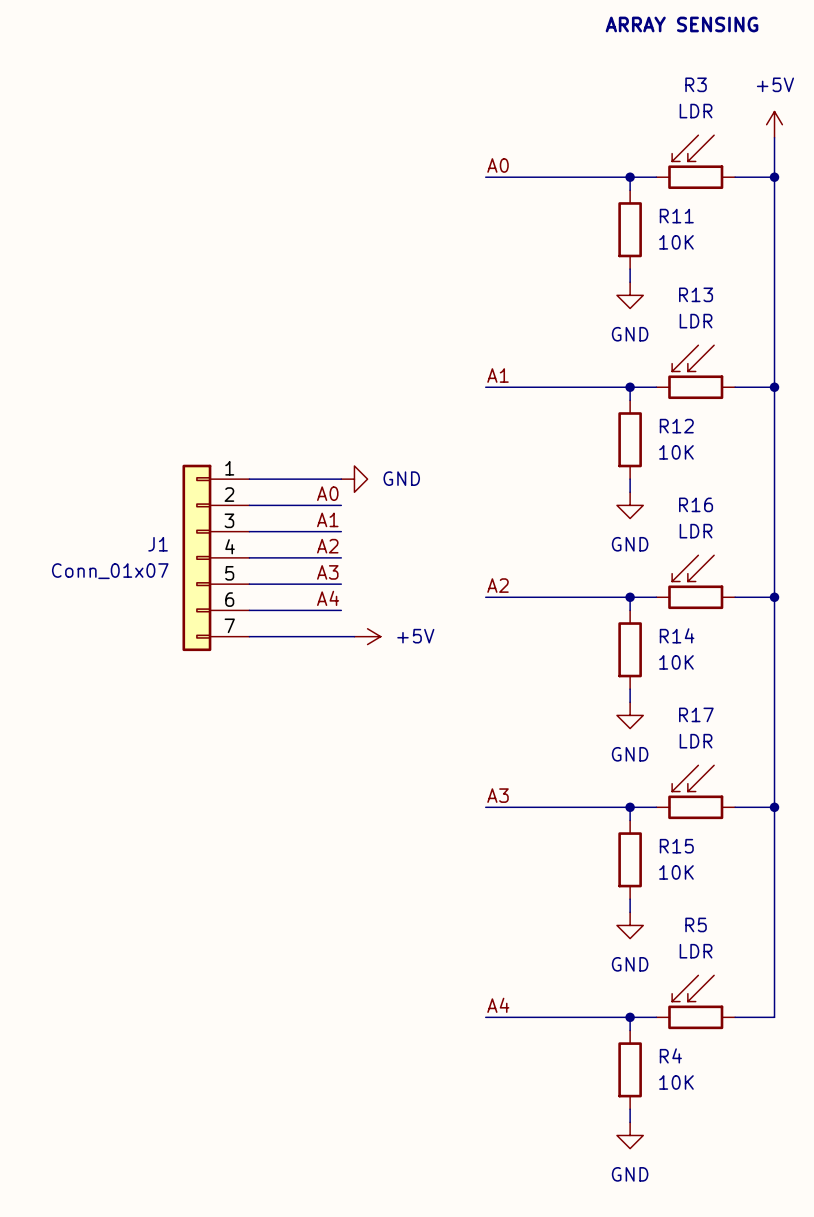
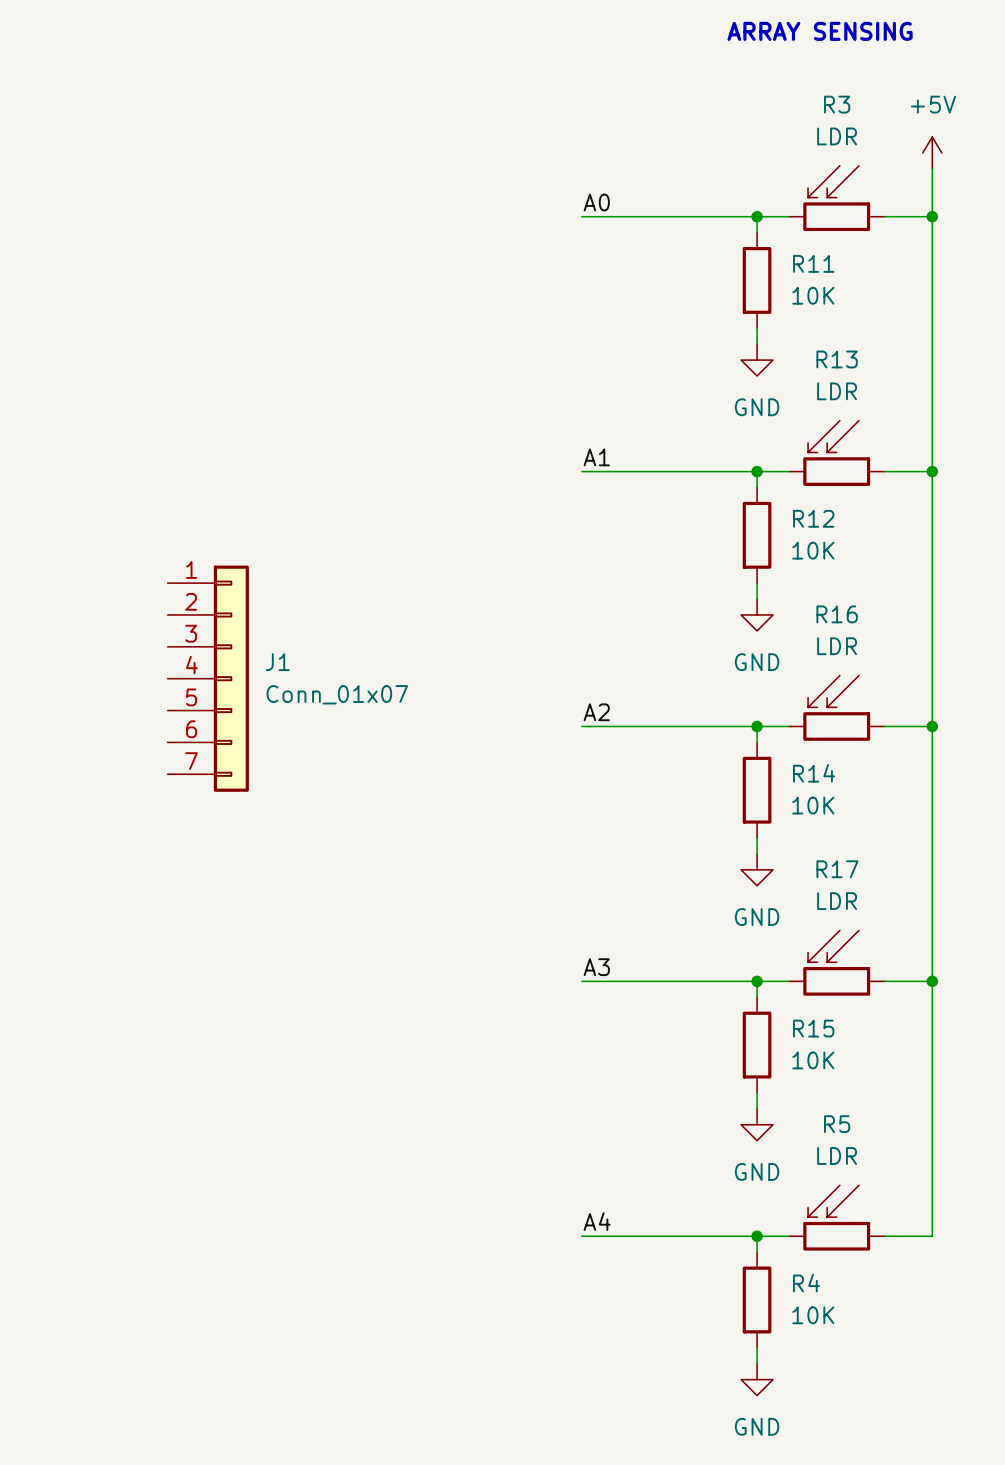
wire: (249, 479) (341, 479) -> none
power symbol: GND (354, 479) -> none
label: A0 (327, 493) -> none
wire: (249, 505) (341, 505) -> none
label: A1 (327, 519) -> none
wire: (249, 531) (341, 531) -> none
label: A2 (327, 546) -> none
J1 flip: as is (196, 557) -> left-right (231, 678)
wire: (249, 557) (341, 557) -> none
label: A3 (327, 572) -> none
wire: (249, 584) (341, 584) -> none
label: A4 (328, 598) -> none
wire: (249, 610) (341, 610) -> none
wire: (249, 636) (354, 636) -> none
power symbol: +5V (367, 636) -> none

